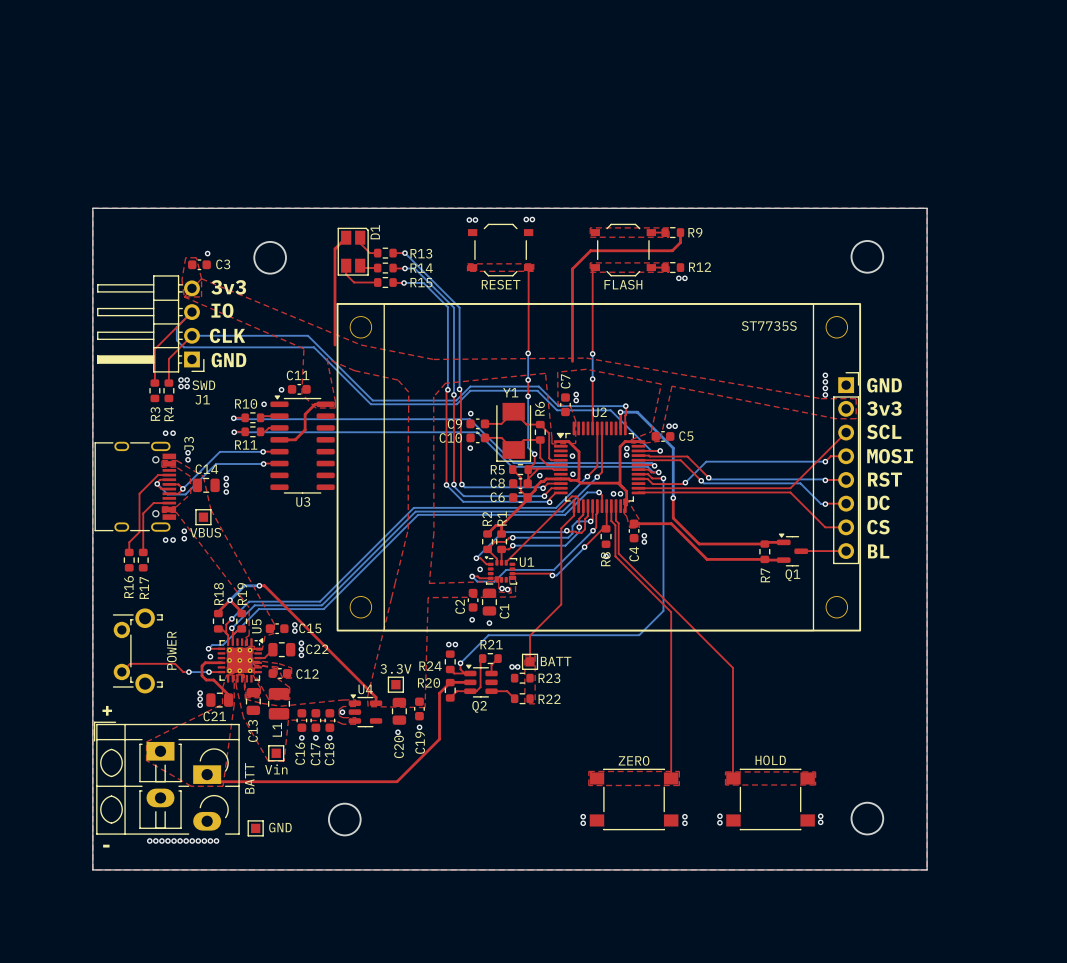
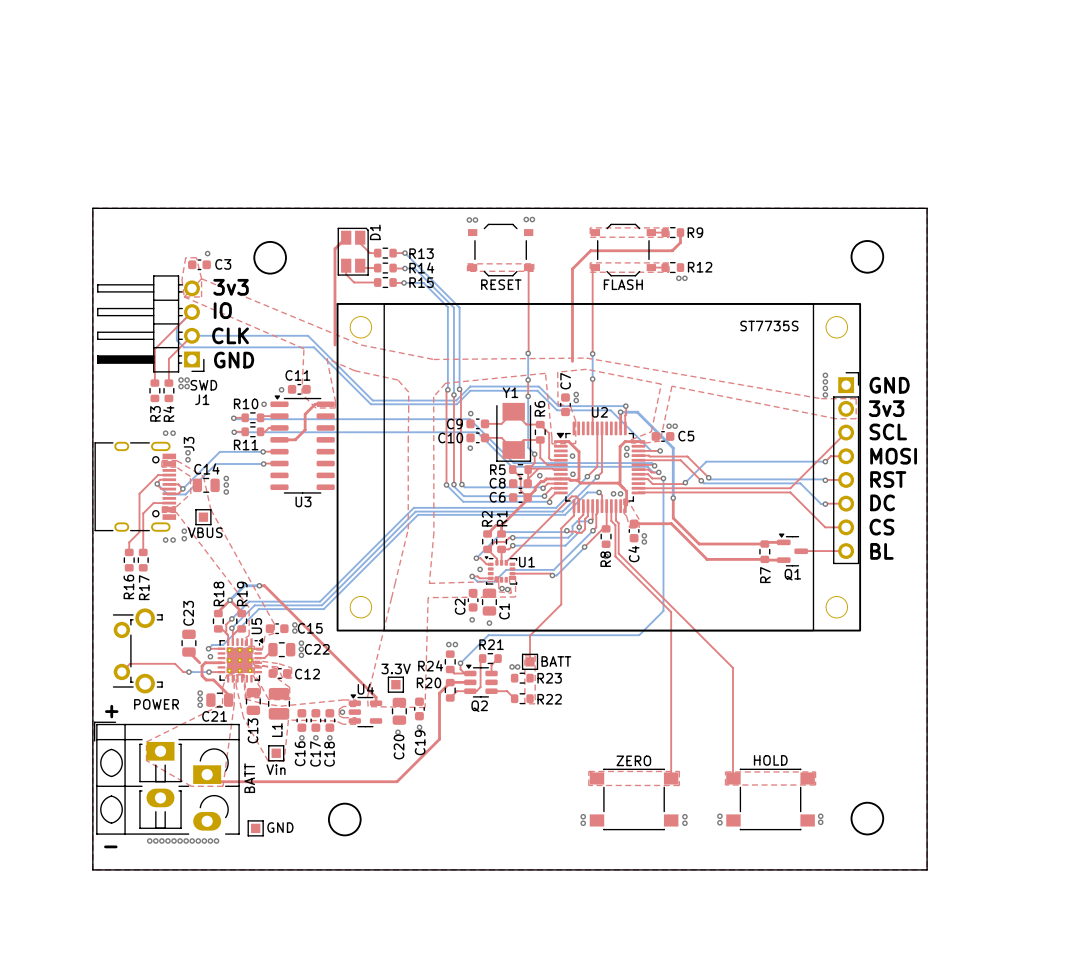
C23: none -> (188, 643)
part value rotation: 0° (171, 650) -> 90° clockwise (156, 704)
top track: none -> (188, 652) (199, 662)

